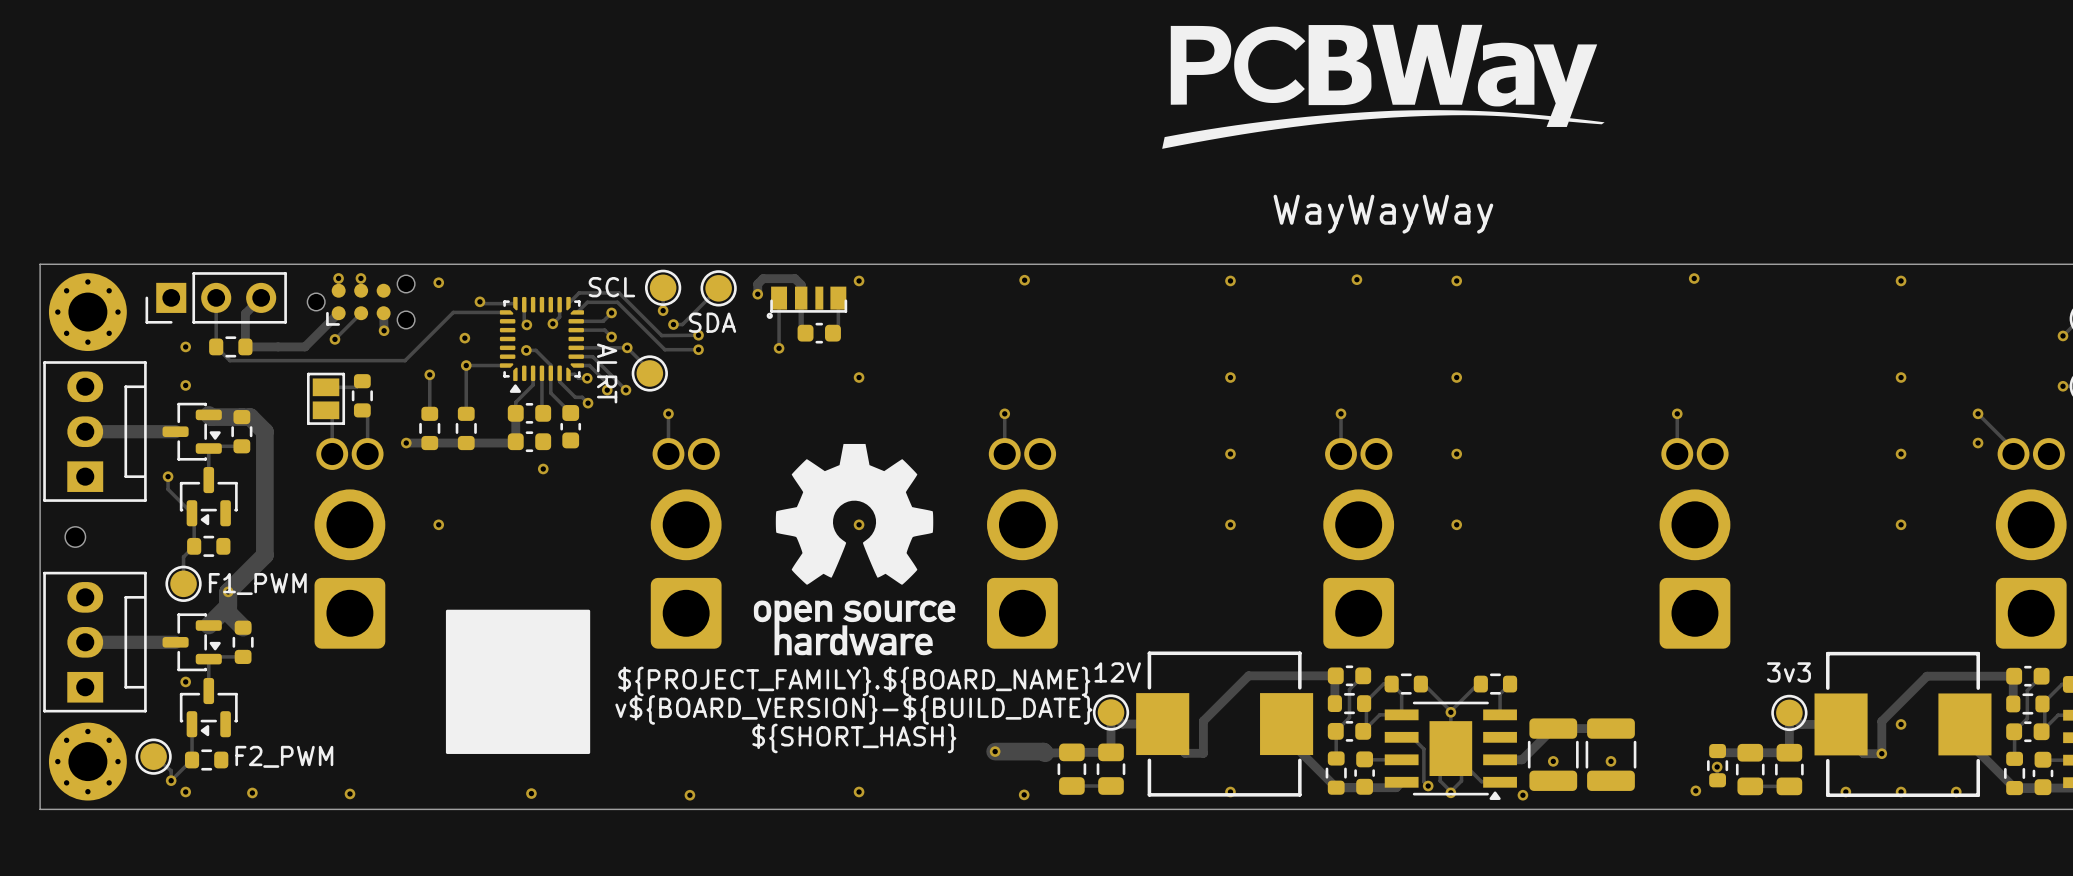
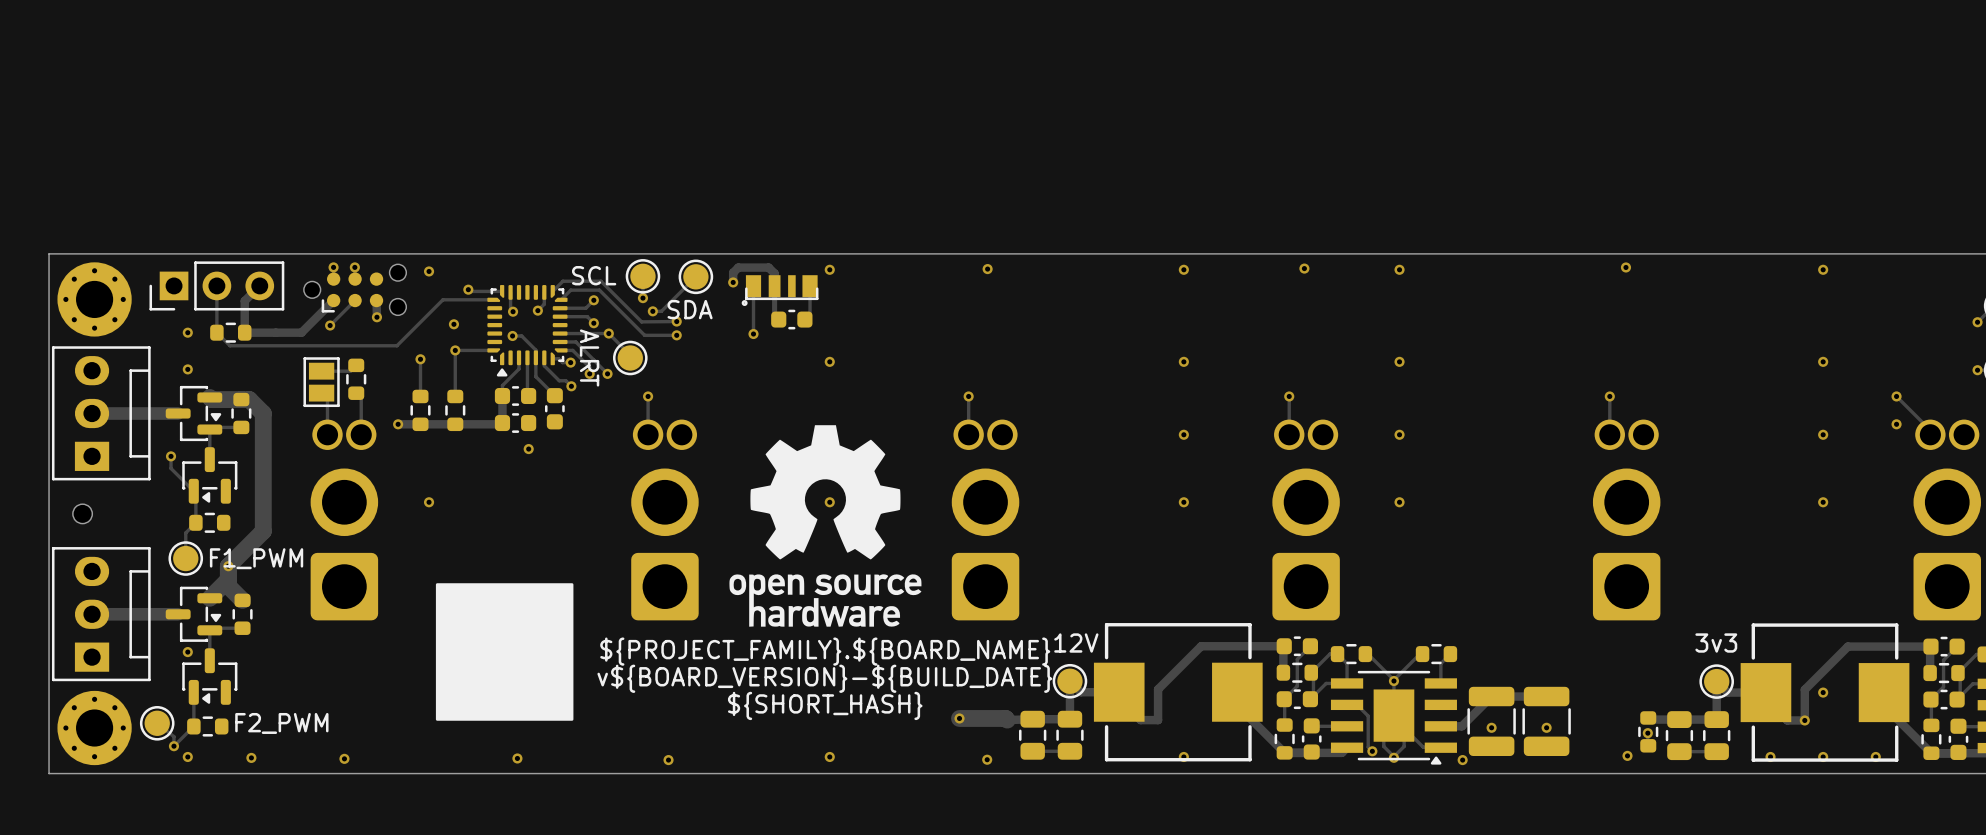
drawing: [1162, 24, 1605, 149] -> none
text: WayWayWay (1383, 214) -> none

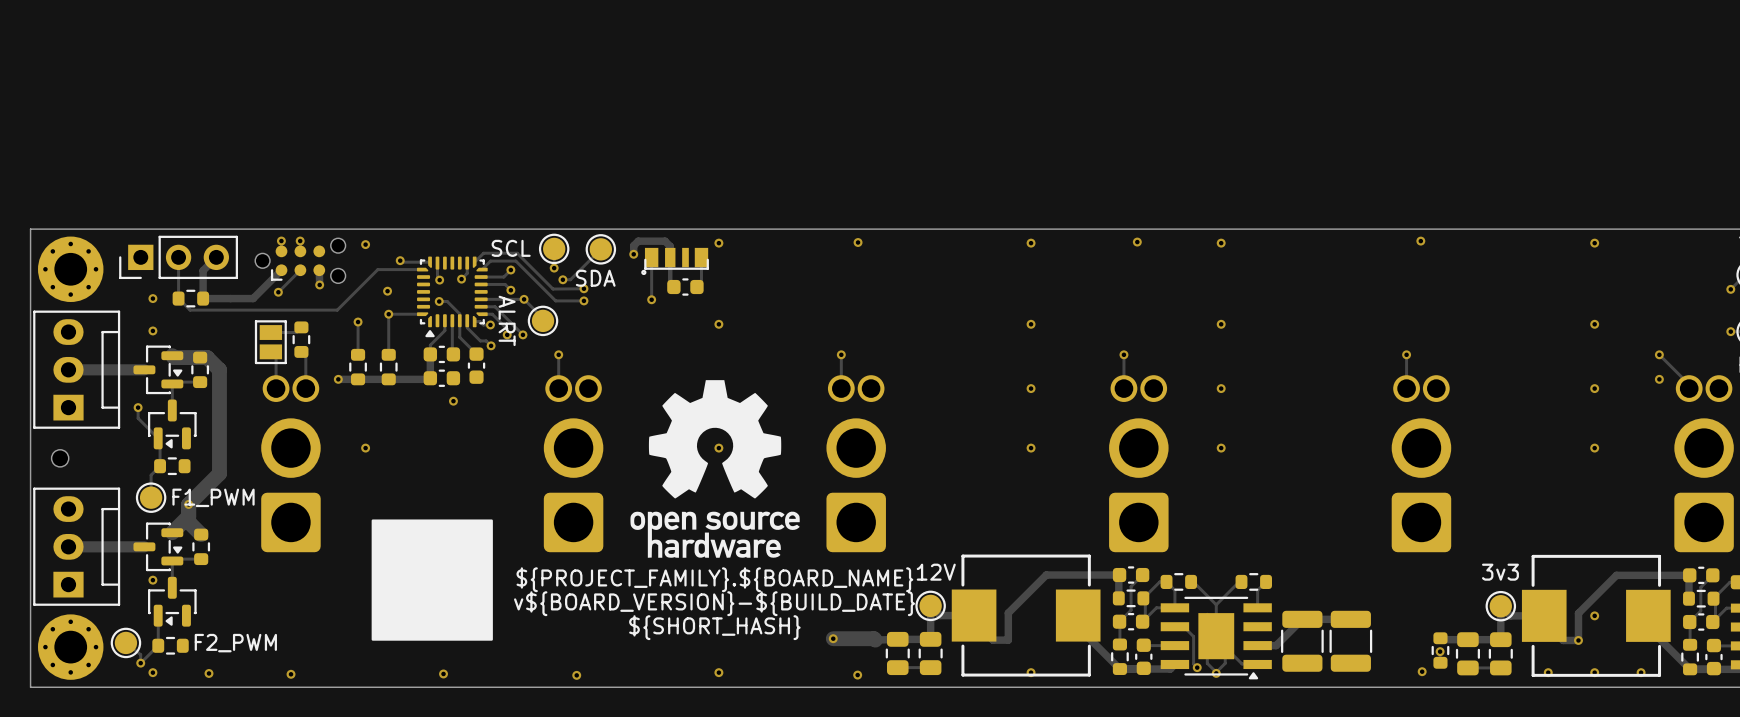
via: (1393, 681) -> none
via: (1491, 727) -> none
via: (1546, 727) -> none
via: (1462, 760) -> none

